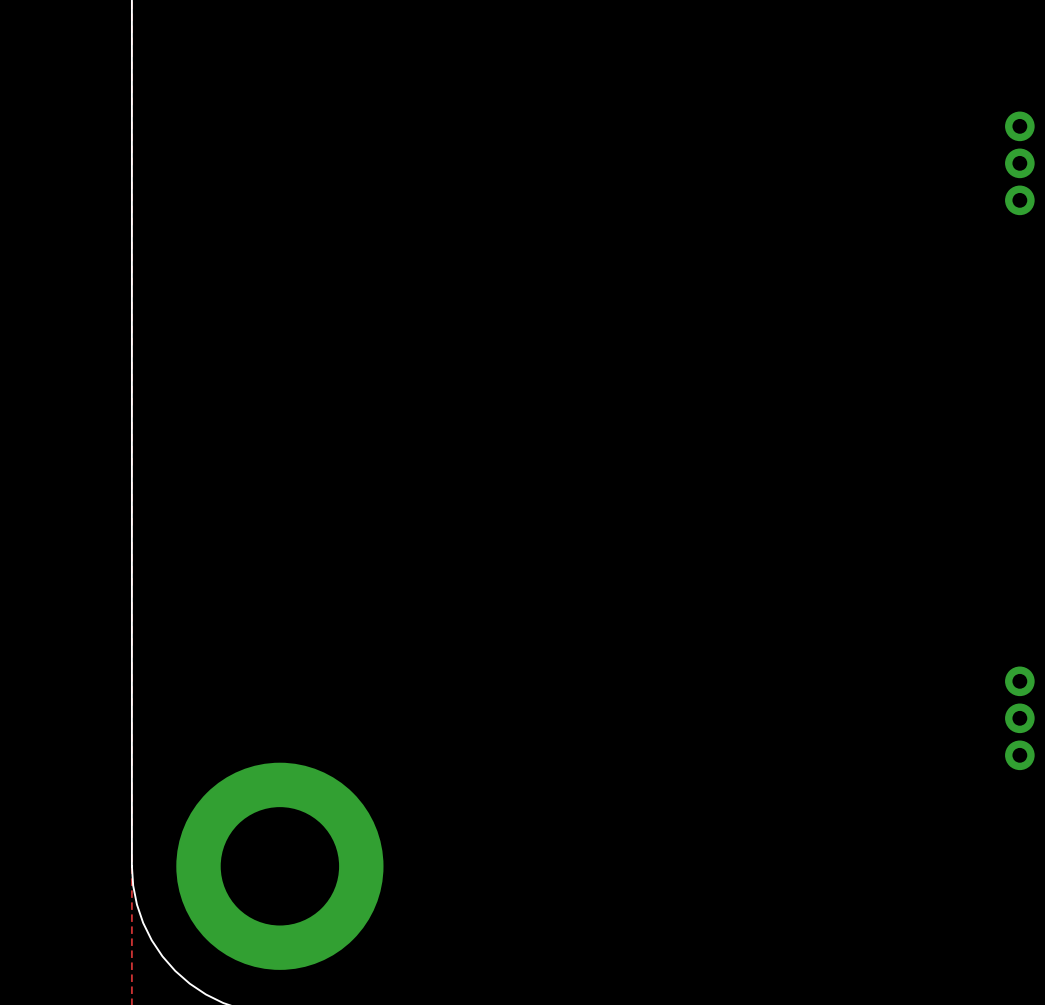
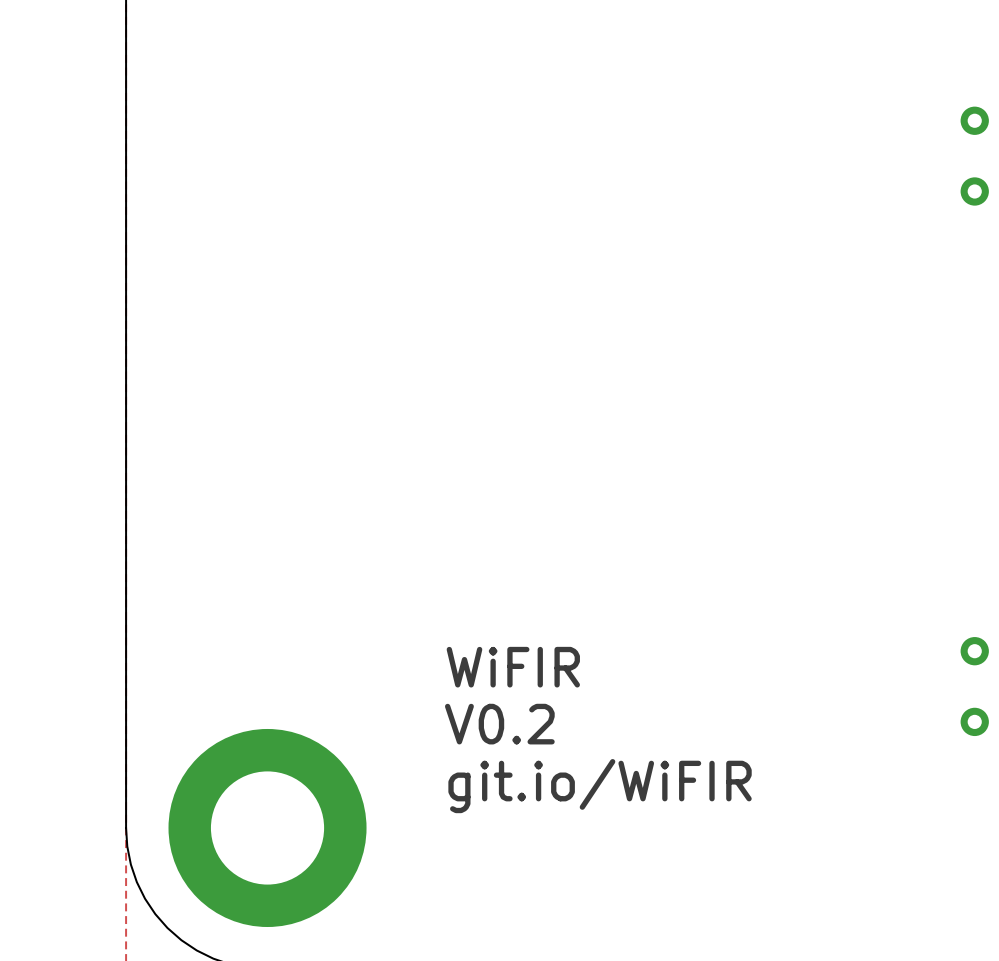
via: (1019, 163) -> none
text: none -> WiFIR (513, 667)
via: (1019, 718) -> none
text: none -> V0.2 (499, 724)
text: none -> git.io/WiFIR (600, 786)

